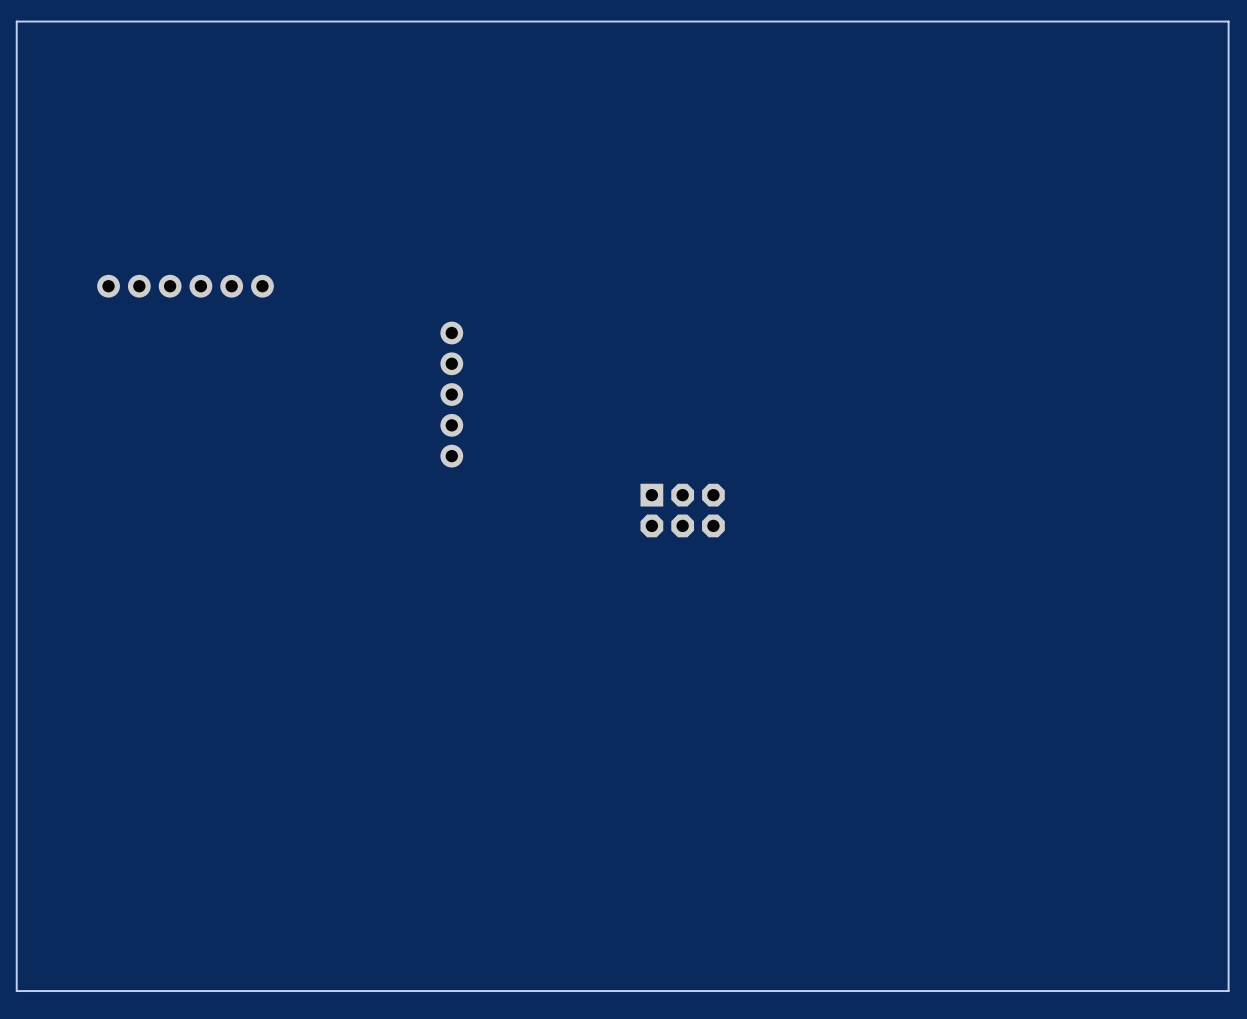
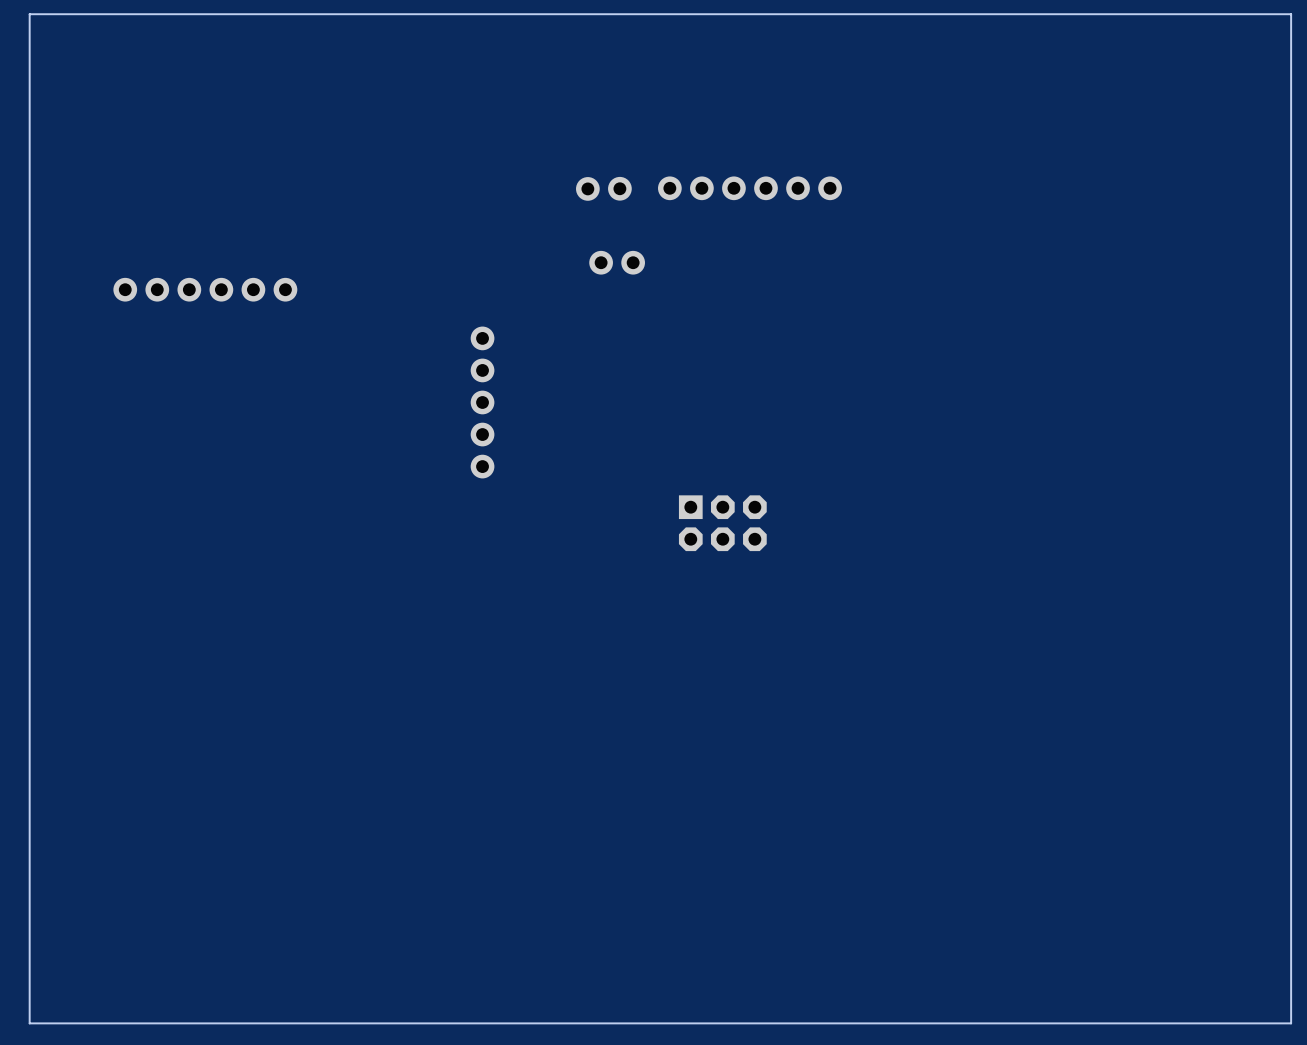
part: none -> (749, 188)
part: none -> (603, 188)
part: none -> (617, 262)

